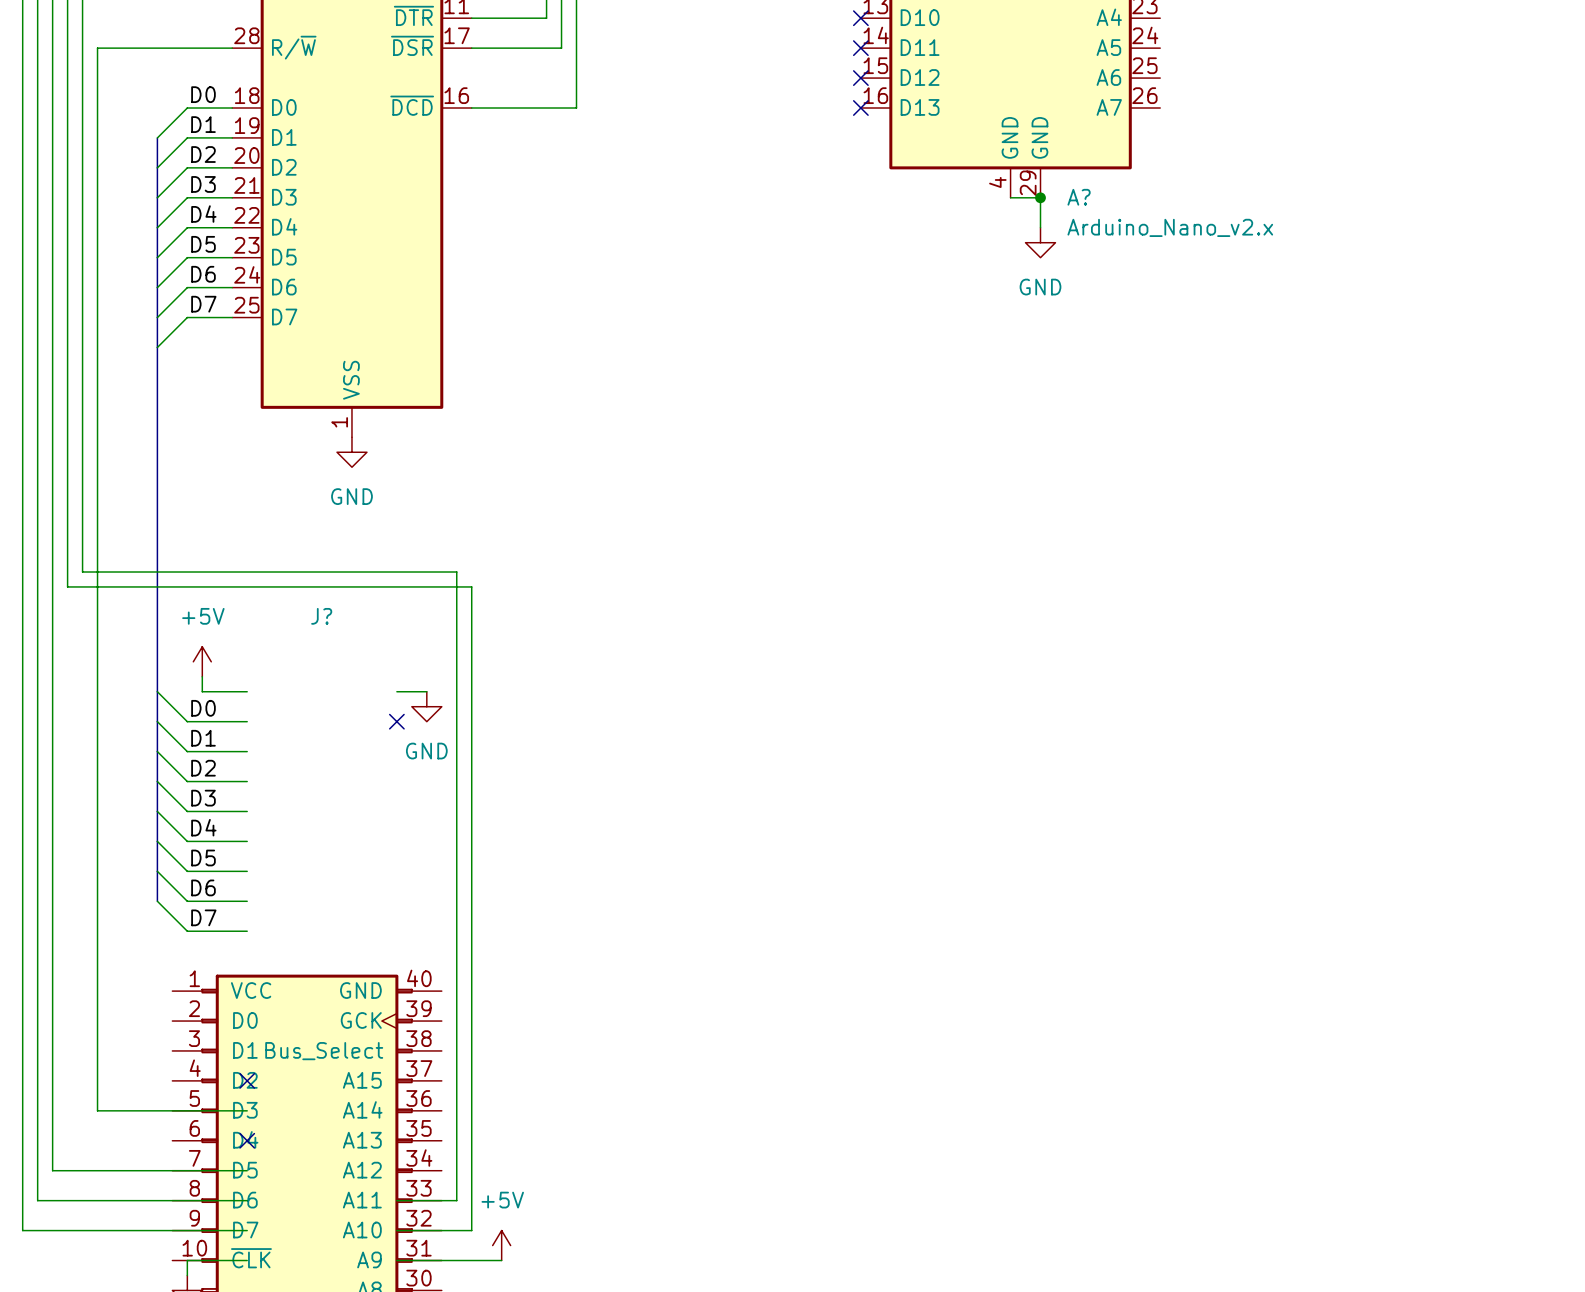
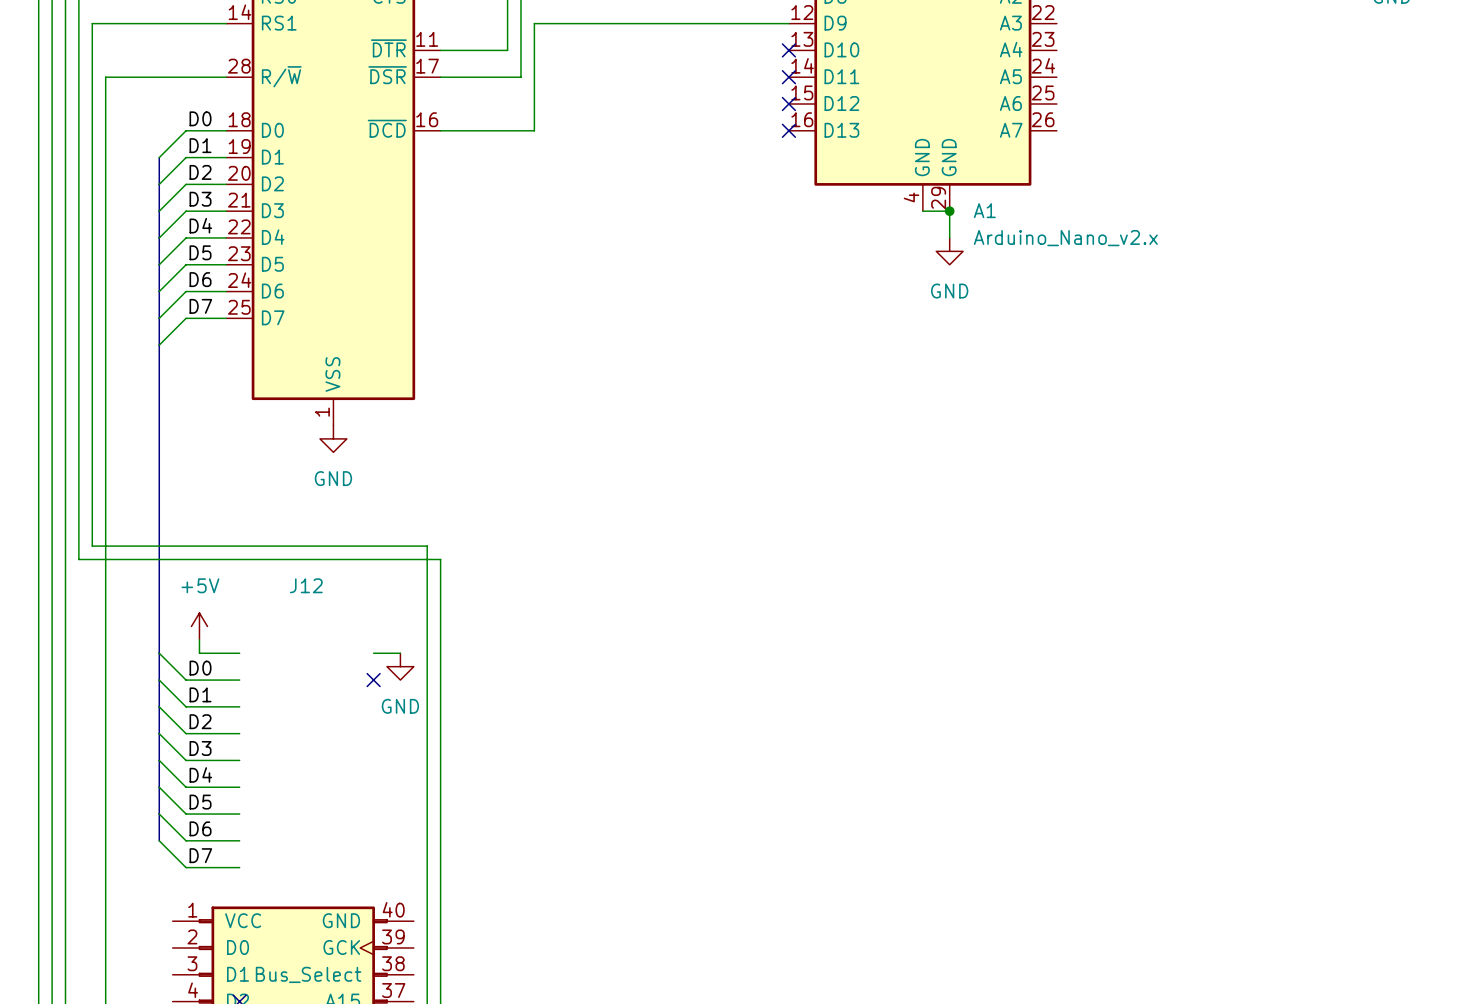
A? name: A? (1079, 197) -> A1 (984, 210)
J? name: J? (321, 616) -> J12 (306, 585)

